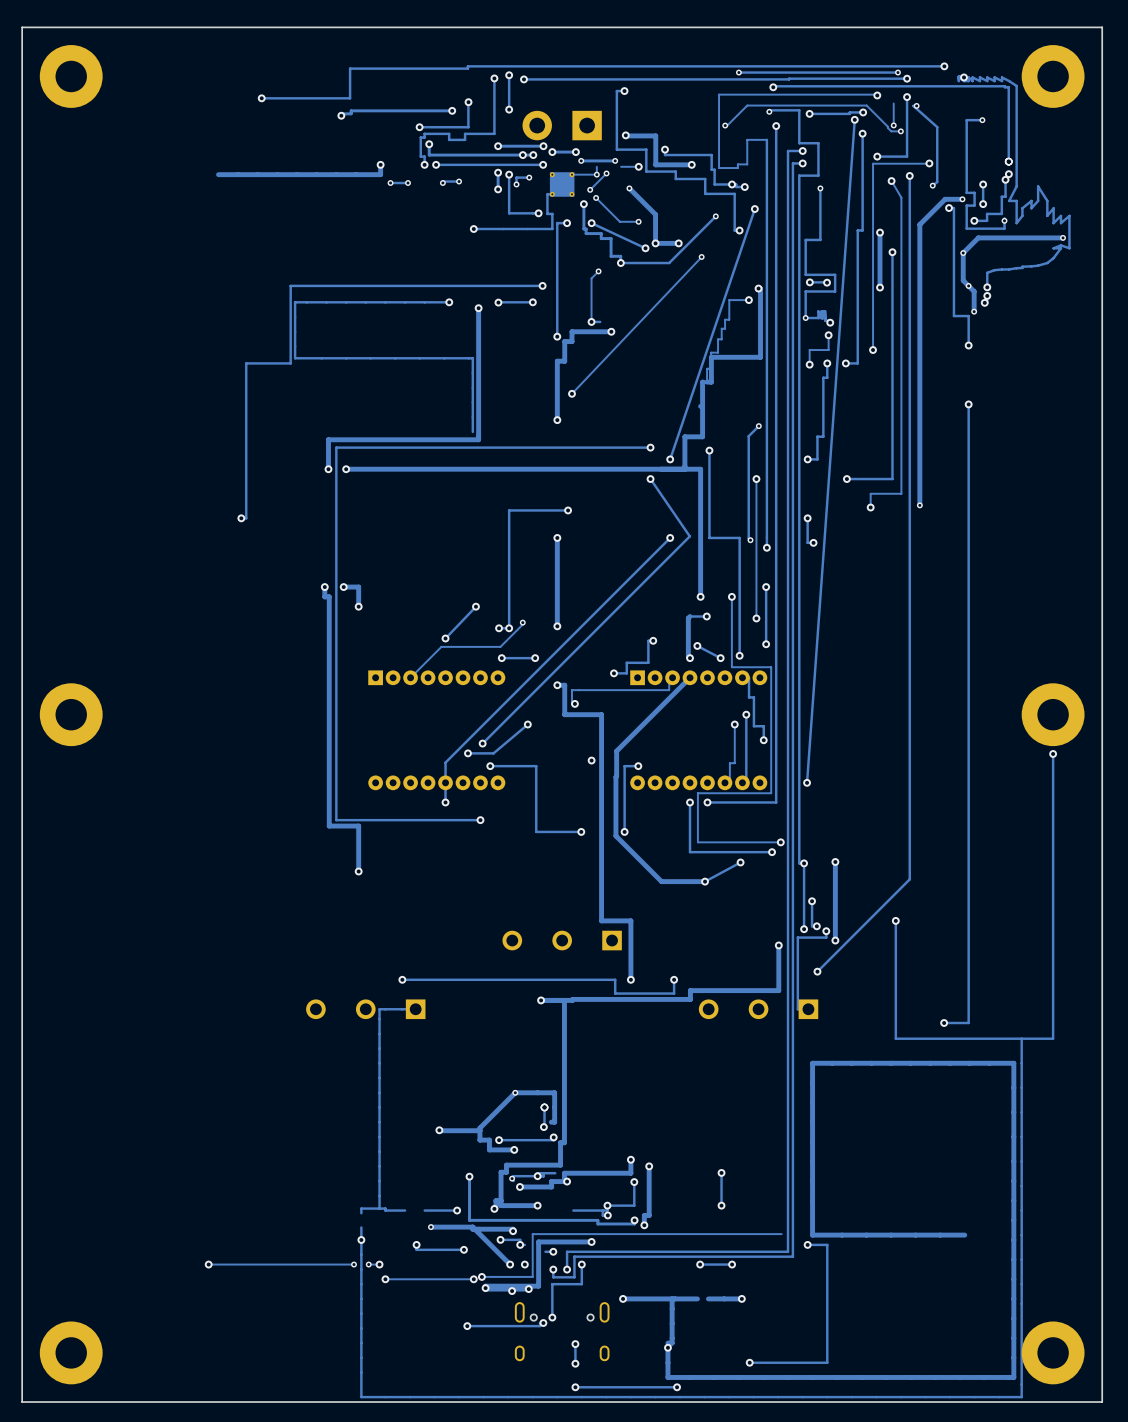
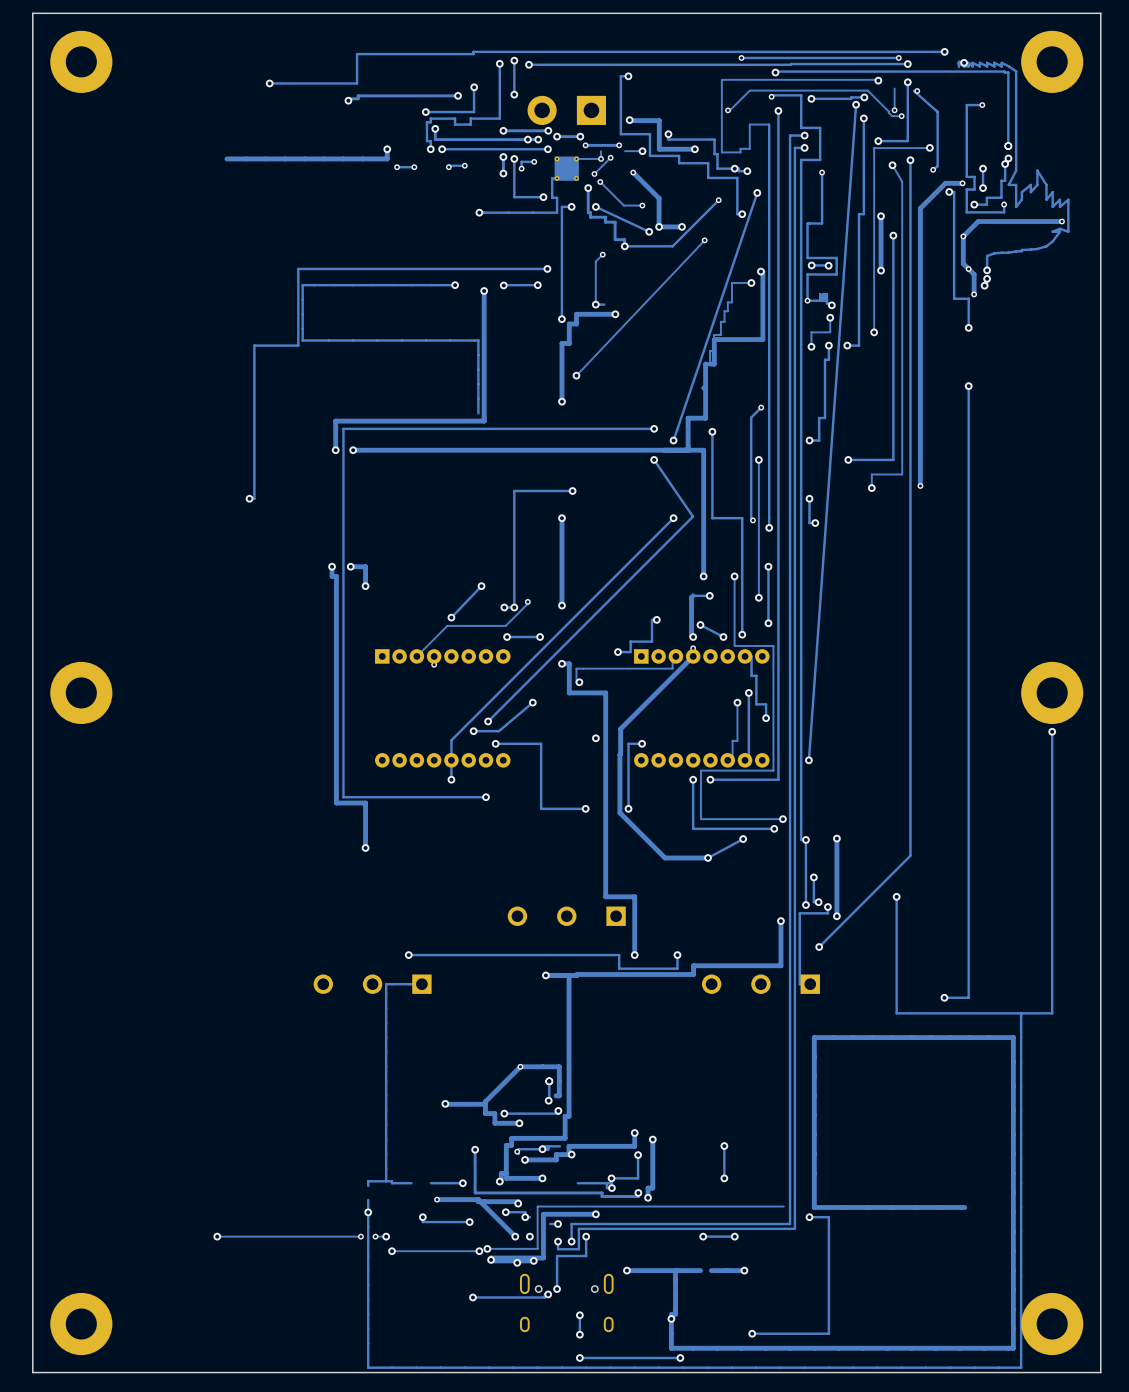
via: none -> (693, 648)
via: none -> (434, 664)

